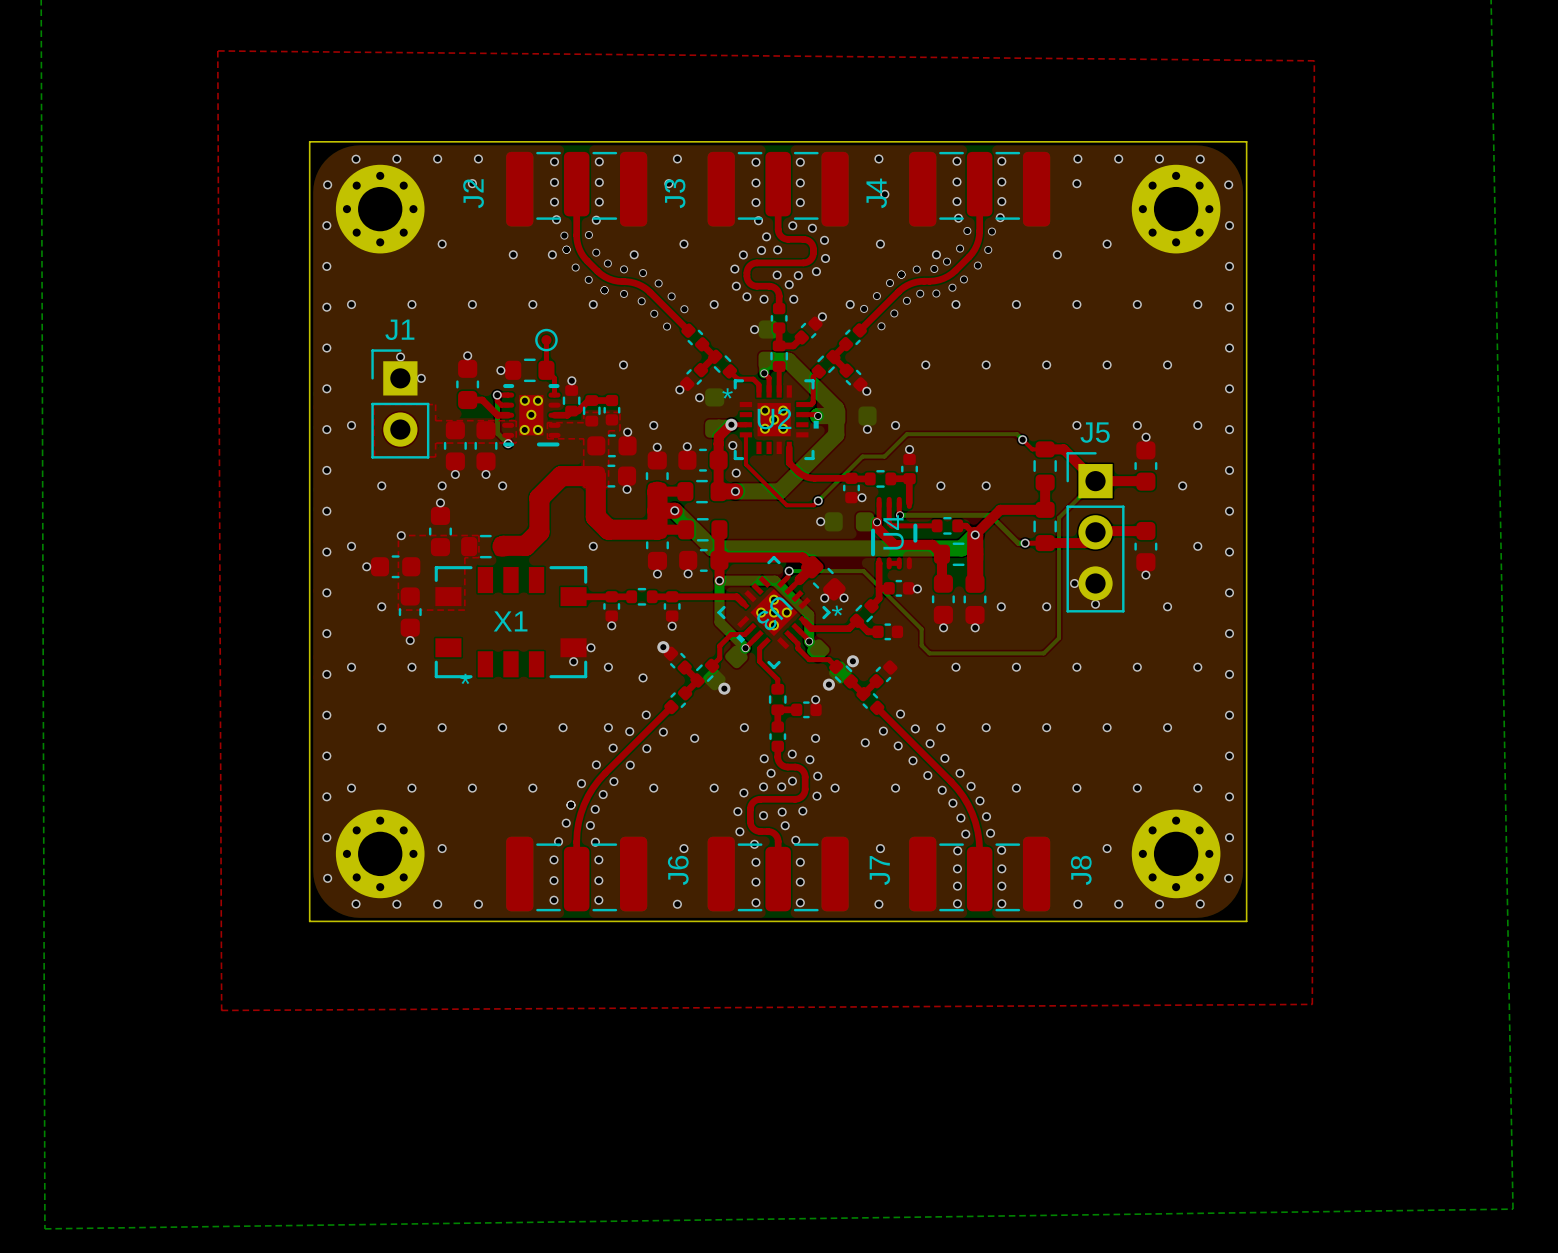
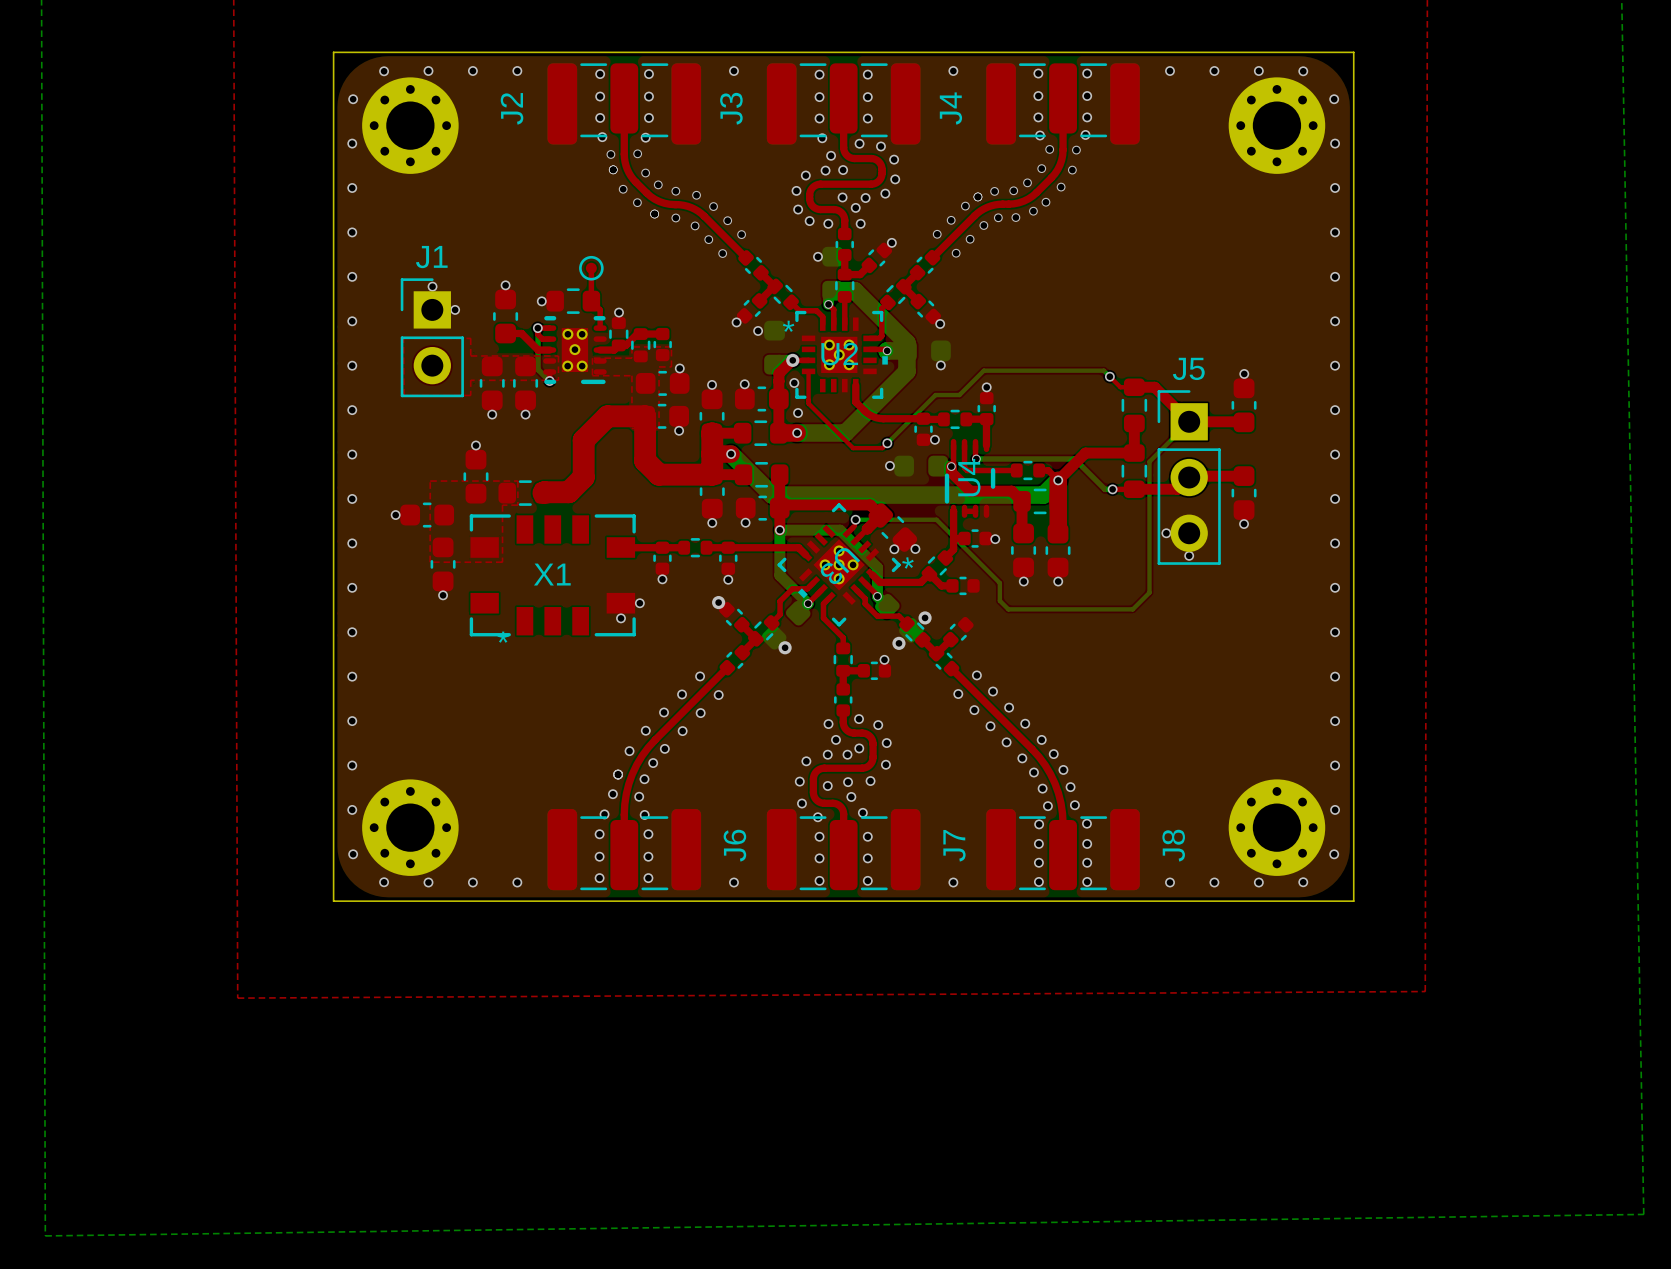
via: (472, 183) -> none
via: (668, 183) -> none
via: (1076, 183) -> none
via: (884, 194) -> none
via: (442, 244) -> none
via: (683, 244) -> none
via: (880, 244) -> none
via: (1107, 244) -> none
via: (513, 254) -> none
via: (552, 254) -> none
via: (634, 254) -> none
via: (936, 254) -> none
via: (1057, 254) -> none
via: (351, 304) -> none
via: (411, 304) -> none
via: (472, 304) -> none
via: (532, 304) -> none
via: (593, 304) -> none
via: (714, 304) -> none
via: (850, 304) -> none
via: (955, 304) -> none
via: (1016, 304) -> none
via: (1076, 304) -> none
via: (1137, 304) -> none
via: (1197, 304) -> none
via: (623, 364) -> none
via: (925, 364) -> none
via: (986, 364) -> none
via: (1046, 364) -> none
via: (1107, 364) -> none
via: (1167, 364) -> none
via: (351, 425) -> none
via: (653, 425) -> none
via: (895, 425) -> none
via: (1076, 425) -> none
via: (1137, 425) -> none
via: (1197, 425) -> none
via: (381, 485) -> none
via: (442, 485) -> none
via: (502, 485) -> none
via: (940, 485) -> none
via: (986, 485) -> none
via: (1182, 485) -> none
via: (401, 535) -> none
via: (351, 546) -> none
via: (593, 546) -> none
via: (1197, 546) -> none
via: (381, 606) -> none
via: (1001, 606) -> none
via: (1046, 606) -> none
via: (1167, 606) -> none
via: (351, 667) -> none
via: (411, 667) -> none
via: (608, 667) -> none
via: (955, 667) -> none
via: (1016, 667) -> none
via: (1076, 667) -> none
via: (1137, 667) -> none
via: (1197, 667) -> none
via: (643, 677) -> none
via: (381, 727) -> none
via: (442, 727) -> none
via: (502, 727) -> none
via: (563, 727) -> none
via: (608, 727) -> none
via: (744, 727) -> none
via: (940, 727) -> none
via: (986, 727) -> none
via: (1046, 727) -> none
via: (1107, 727) -> none
via: (1167, 727) -> none
via: (694, 738) -> none
via: (815, 738) -> none
via: (865, 742) -> none
via: (351, 788) -> none
via: (411, 788) -> none
via: (472, 788) -> none
via: (532, 788) -> none
via: (653, 788) -> none
via: (714, 788) -> none
via: (835, 788) -> none
via: (895, 788) -> none
via: (1016, 788) -> none
via: (1076, 788) -> none
via: (1137, 788) -> none
via: (1197, 788) -> none
via: (442, 848) -> none
via: (683, 848) -> none
via: (880, 848) -> none
via: (1107, 848) -> none

